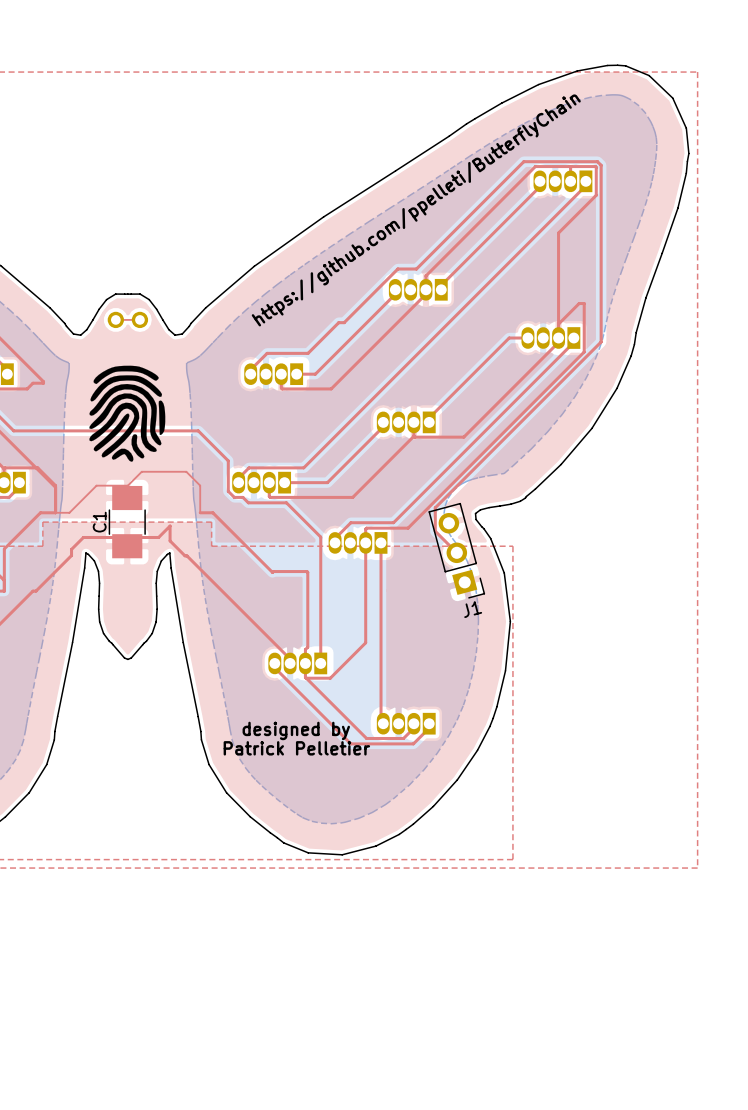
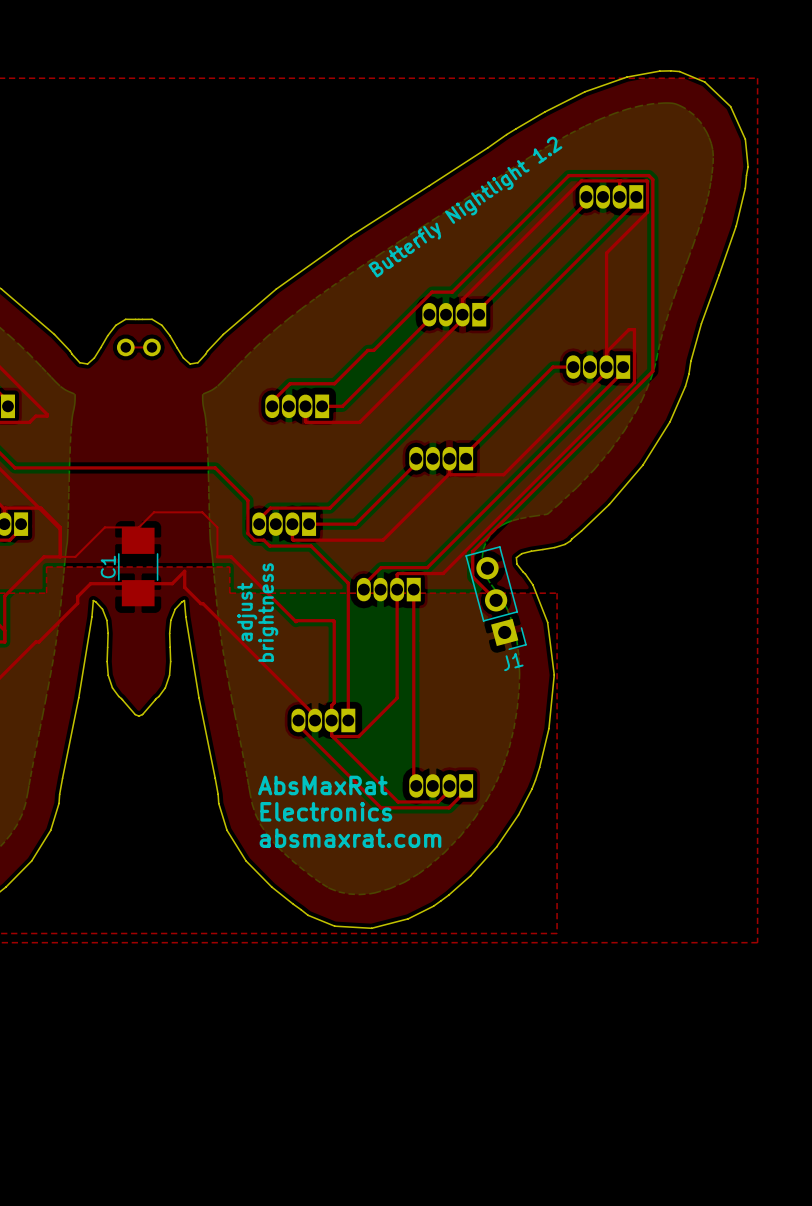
text: none -> Butterfly Nightlight 1.2 (465, 207)
text: https://github.com/ppelleti/ButterflyChain (416, 210) -> none
drawing: [89, 365, 166, 462] -> none
text: none -> adjust (247, 612)
text: none -> brightness (268, 612)
text: none -> AbsMaxRat (322, 785)
text: designed by (296, 730) -> none
text: none -> Electronics (326, 811)
text: Patrick Pelletier (296, 748) -> none
text: none -> absmaxrat.com (350, 838)

